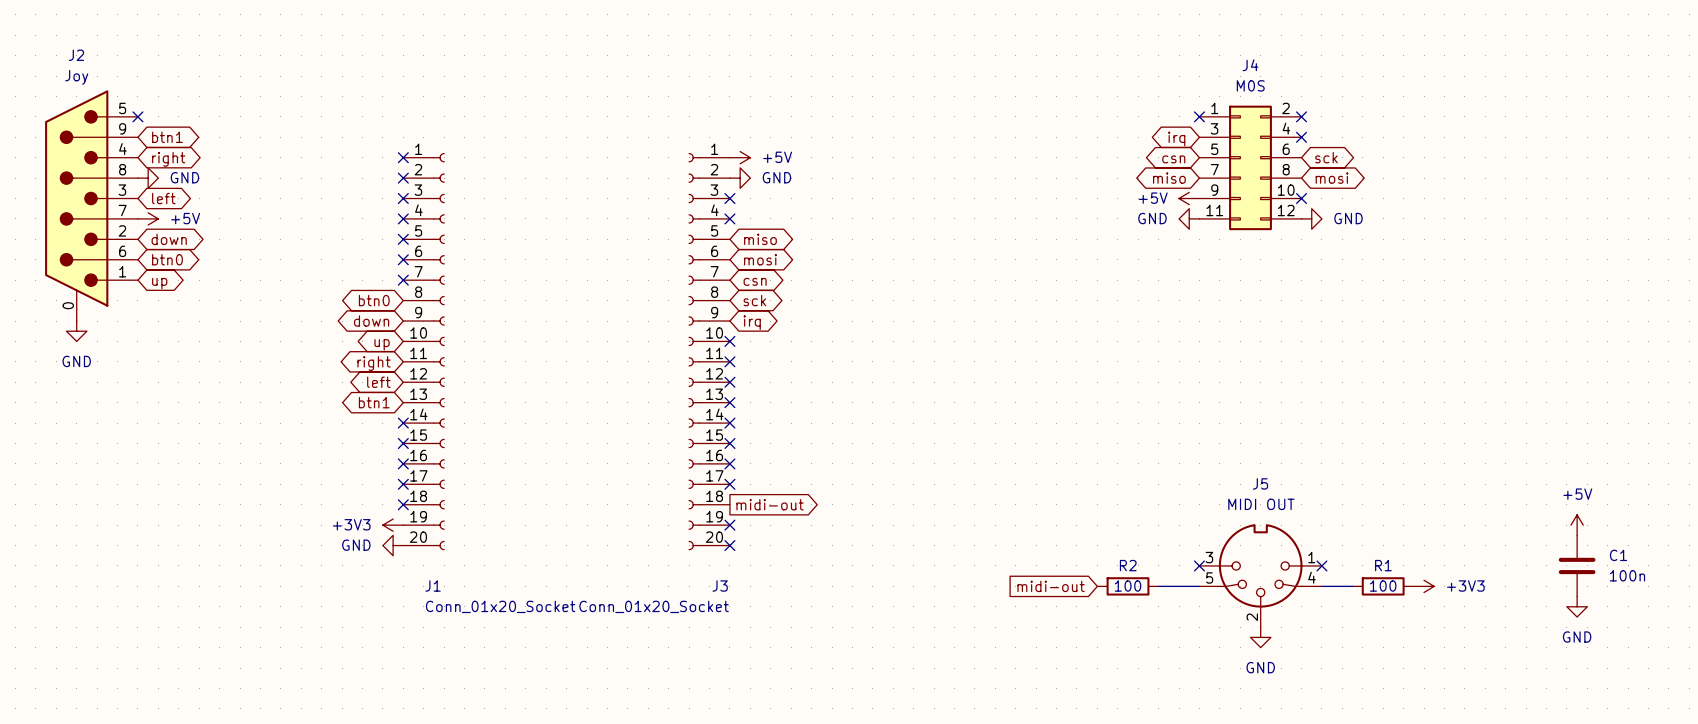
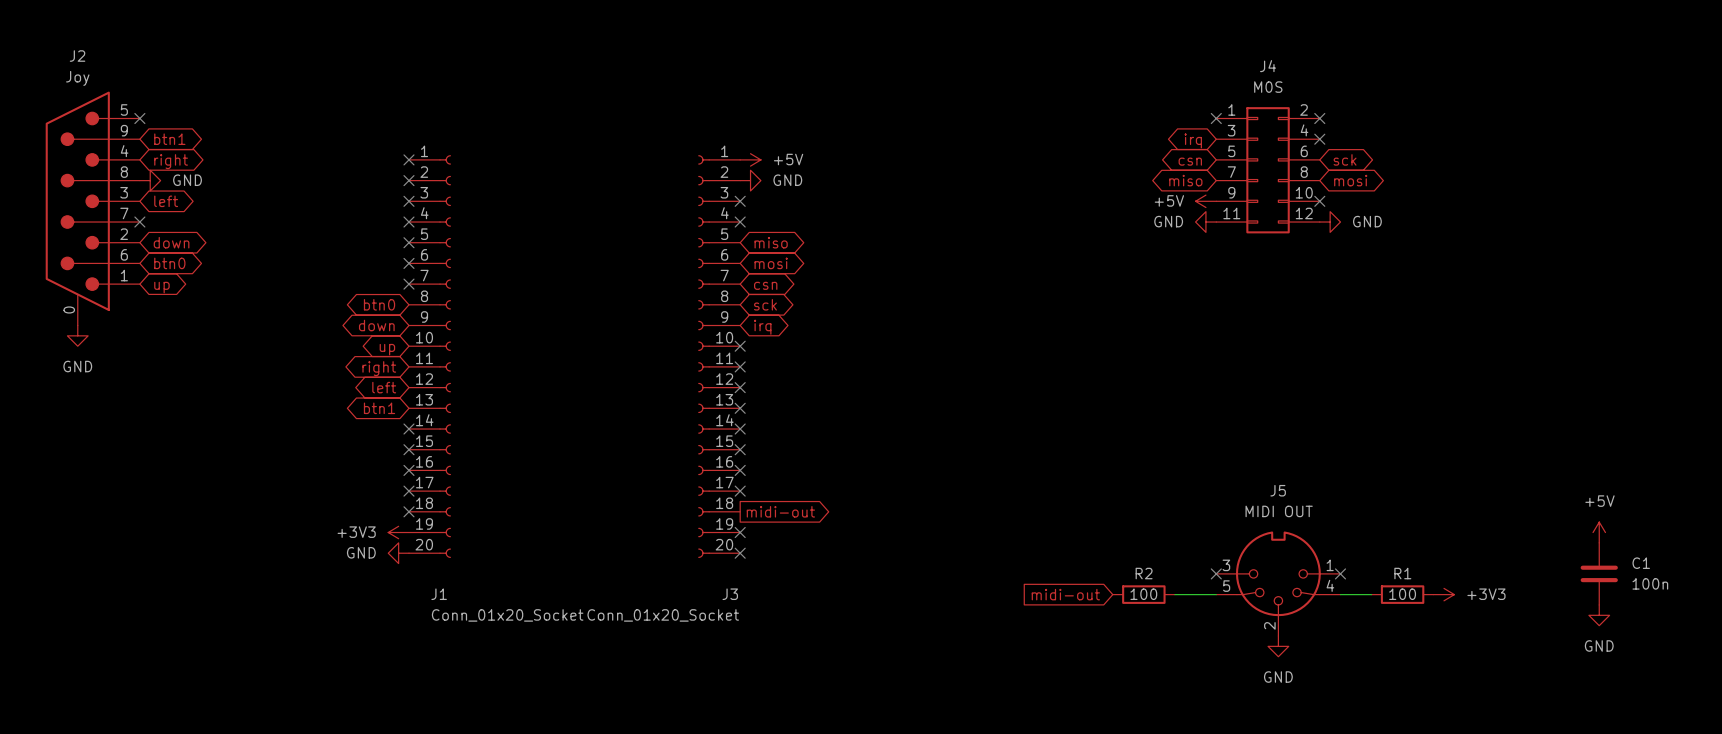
no-connect mark: none -> (139, 222)
power symbol: +5V (148, 218) -> none

